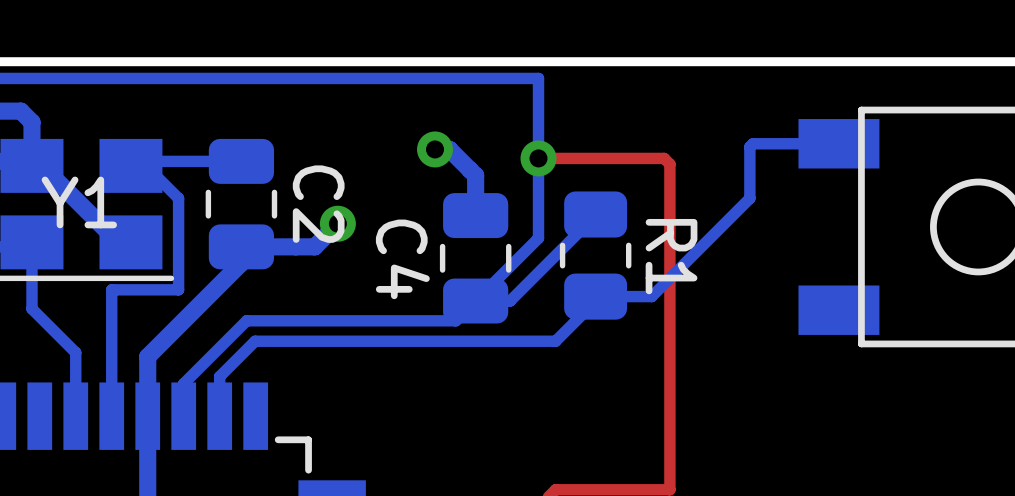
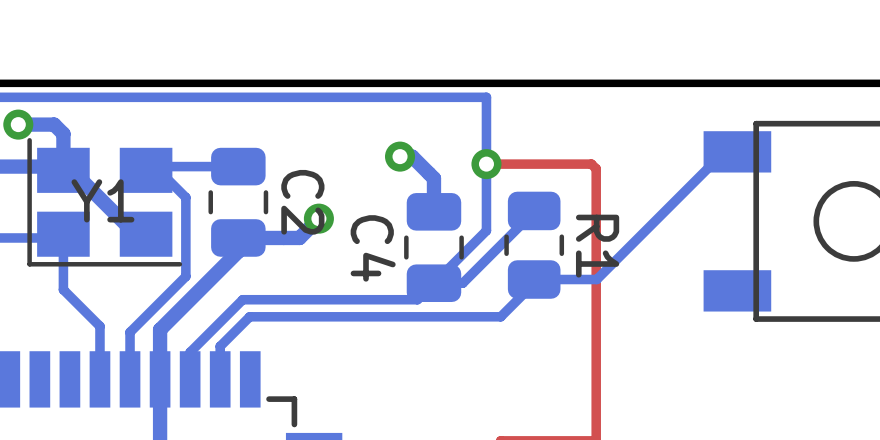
bottom track: (823, 143) (753, 143) (749, 147) (749, 198) (651, 296) -> (724, 151) (596, 279) (581, 279)
bottom track: (178, 289) (111, 289) (111, 359) -> (185, 273) (185, 276) (130, 332)

